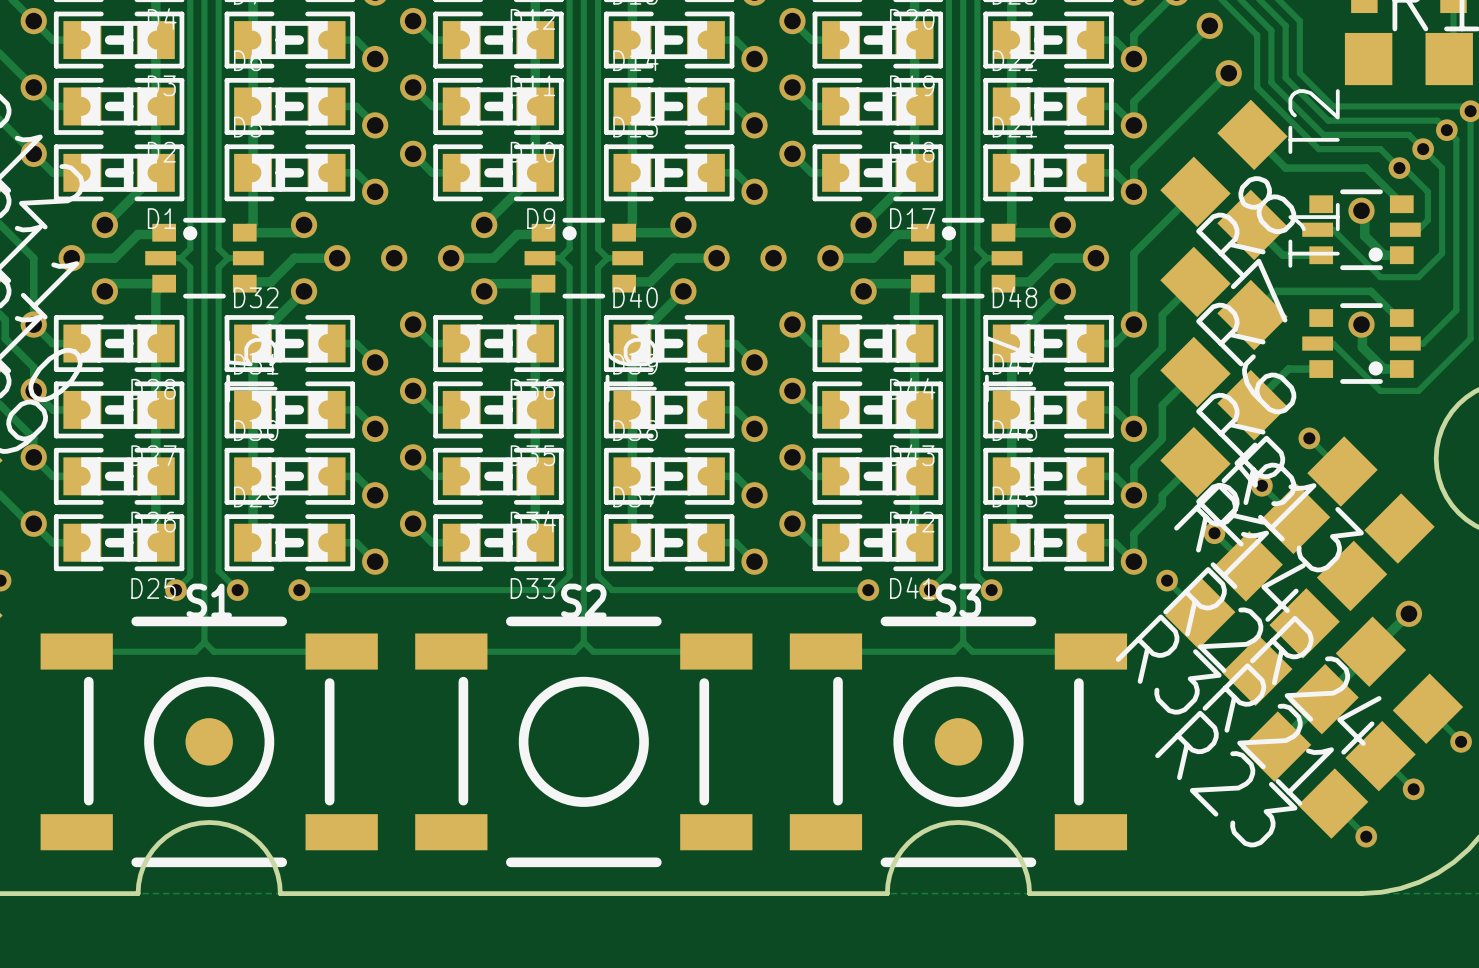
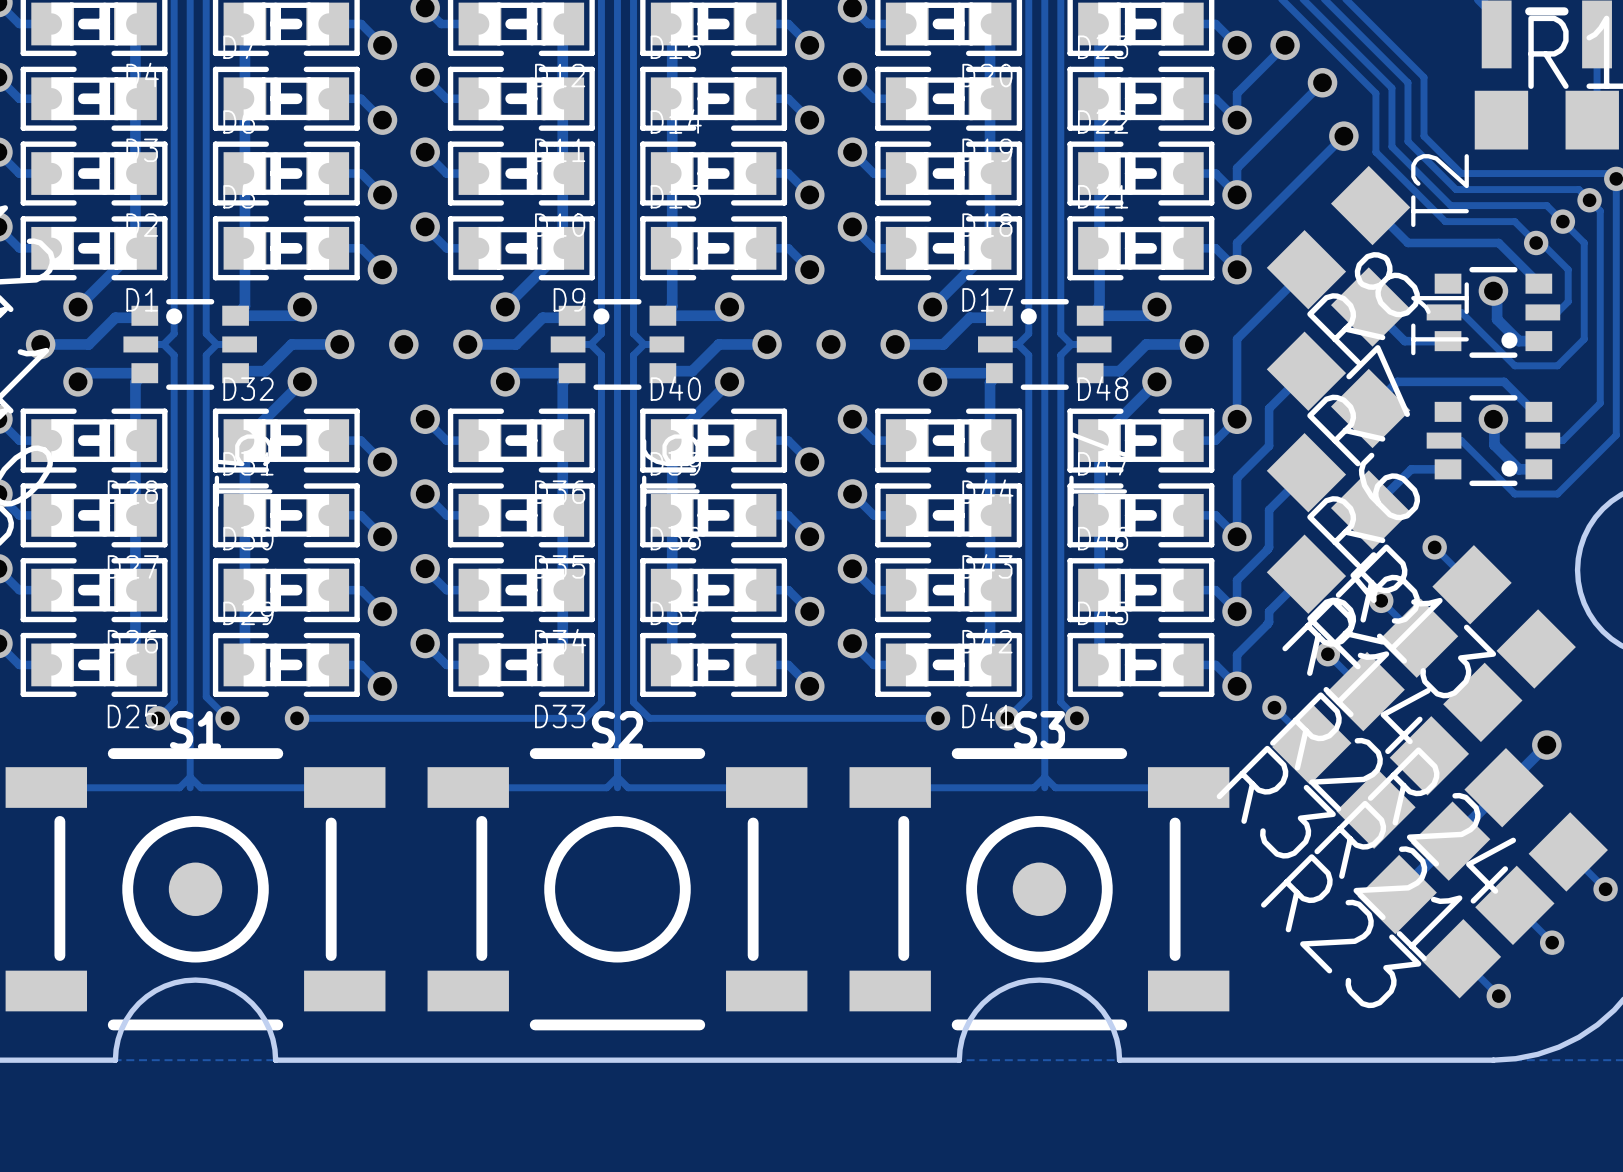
track: none -> (190, 777) (190, 787)
track: none -> (617, 777) (617, 787)
track: none -> (1044, 777) (1044, 787)

